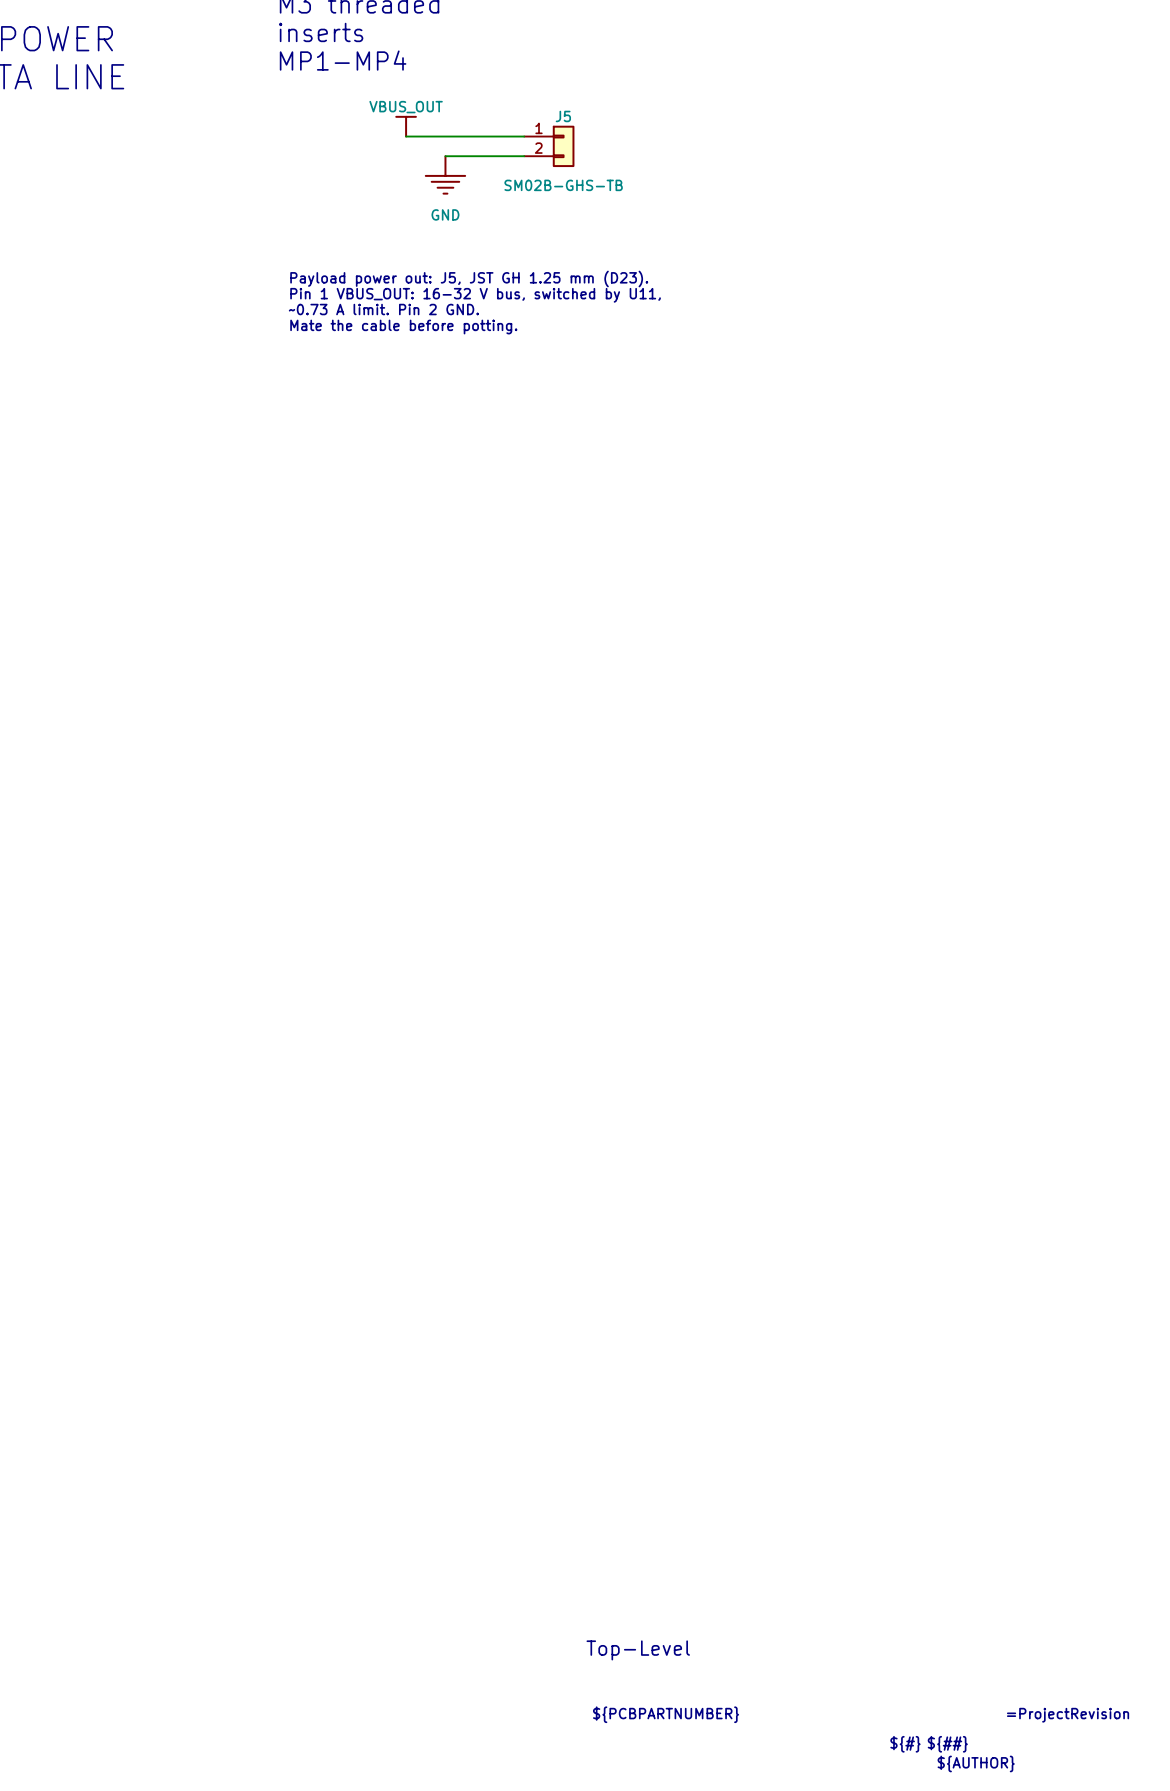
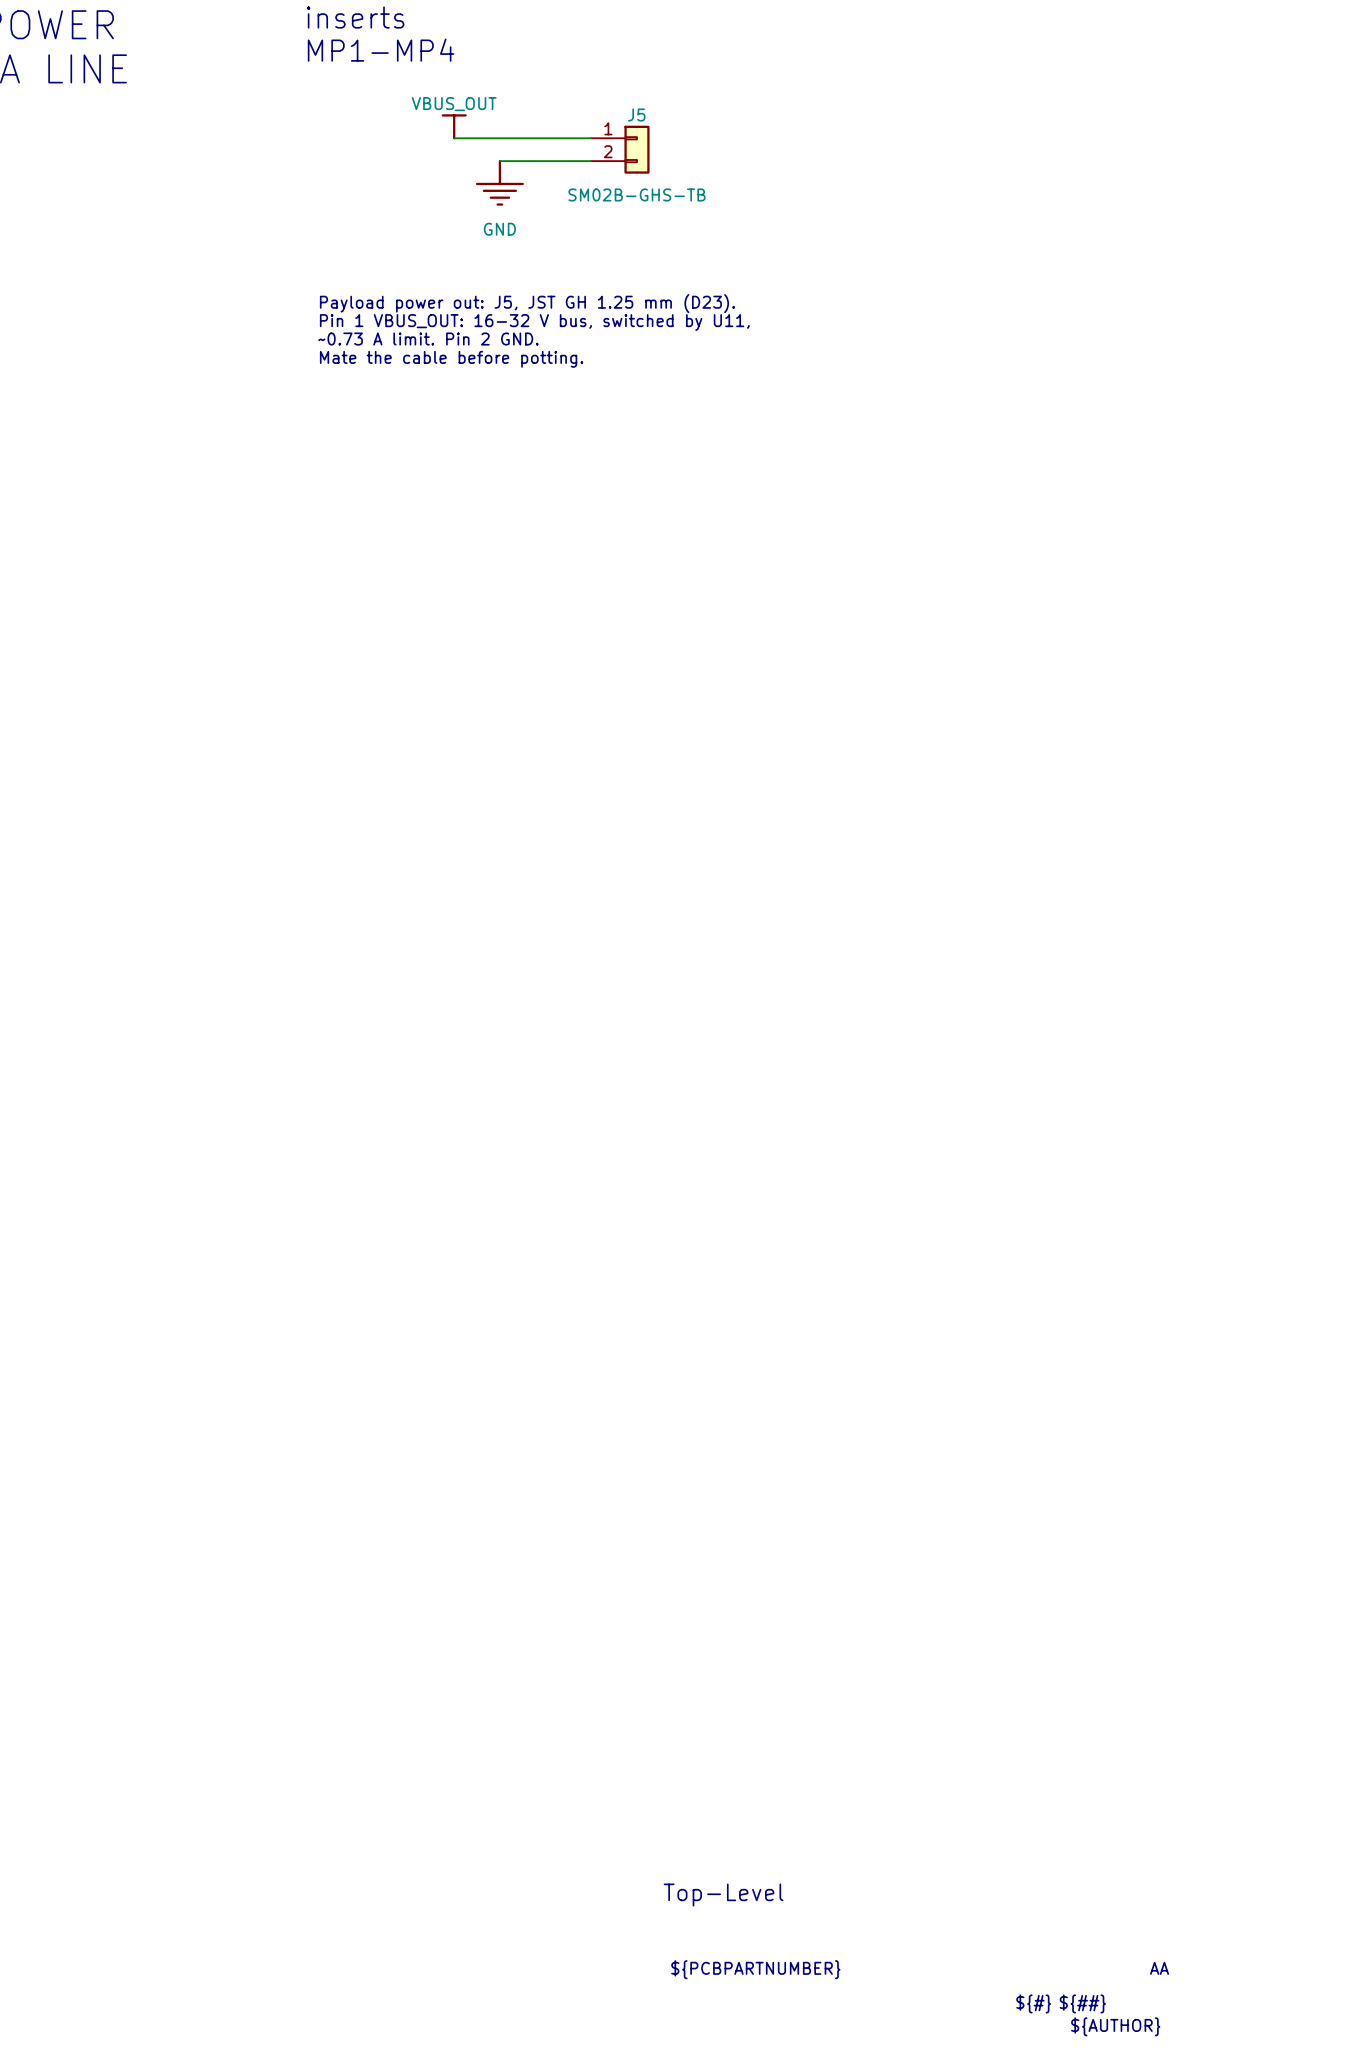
text: =ProjectRevision (1068, 1715) -> AA (1159, 1968)

